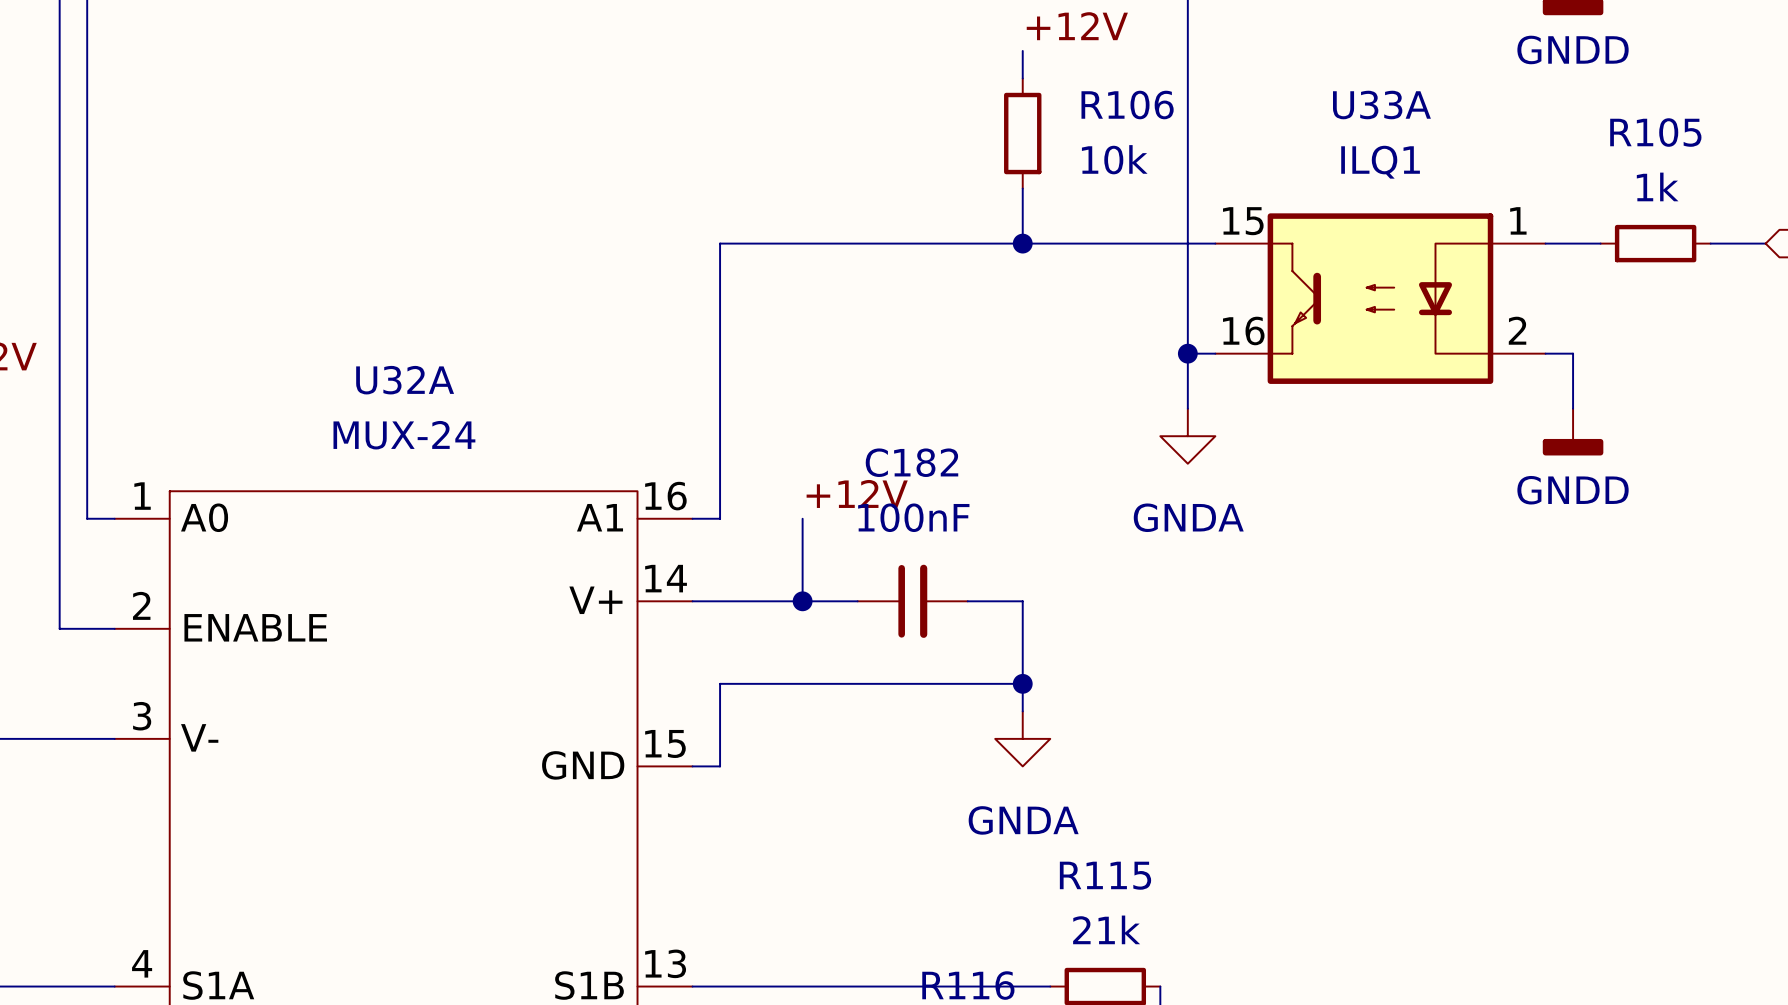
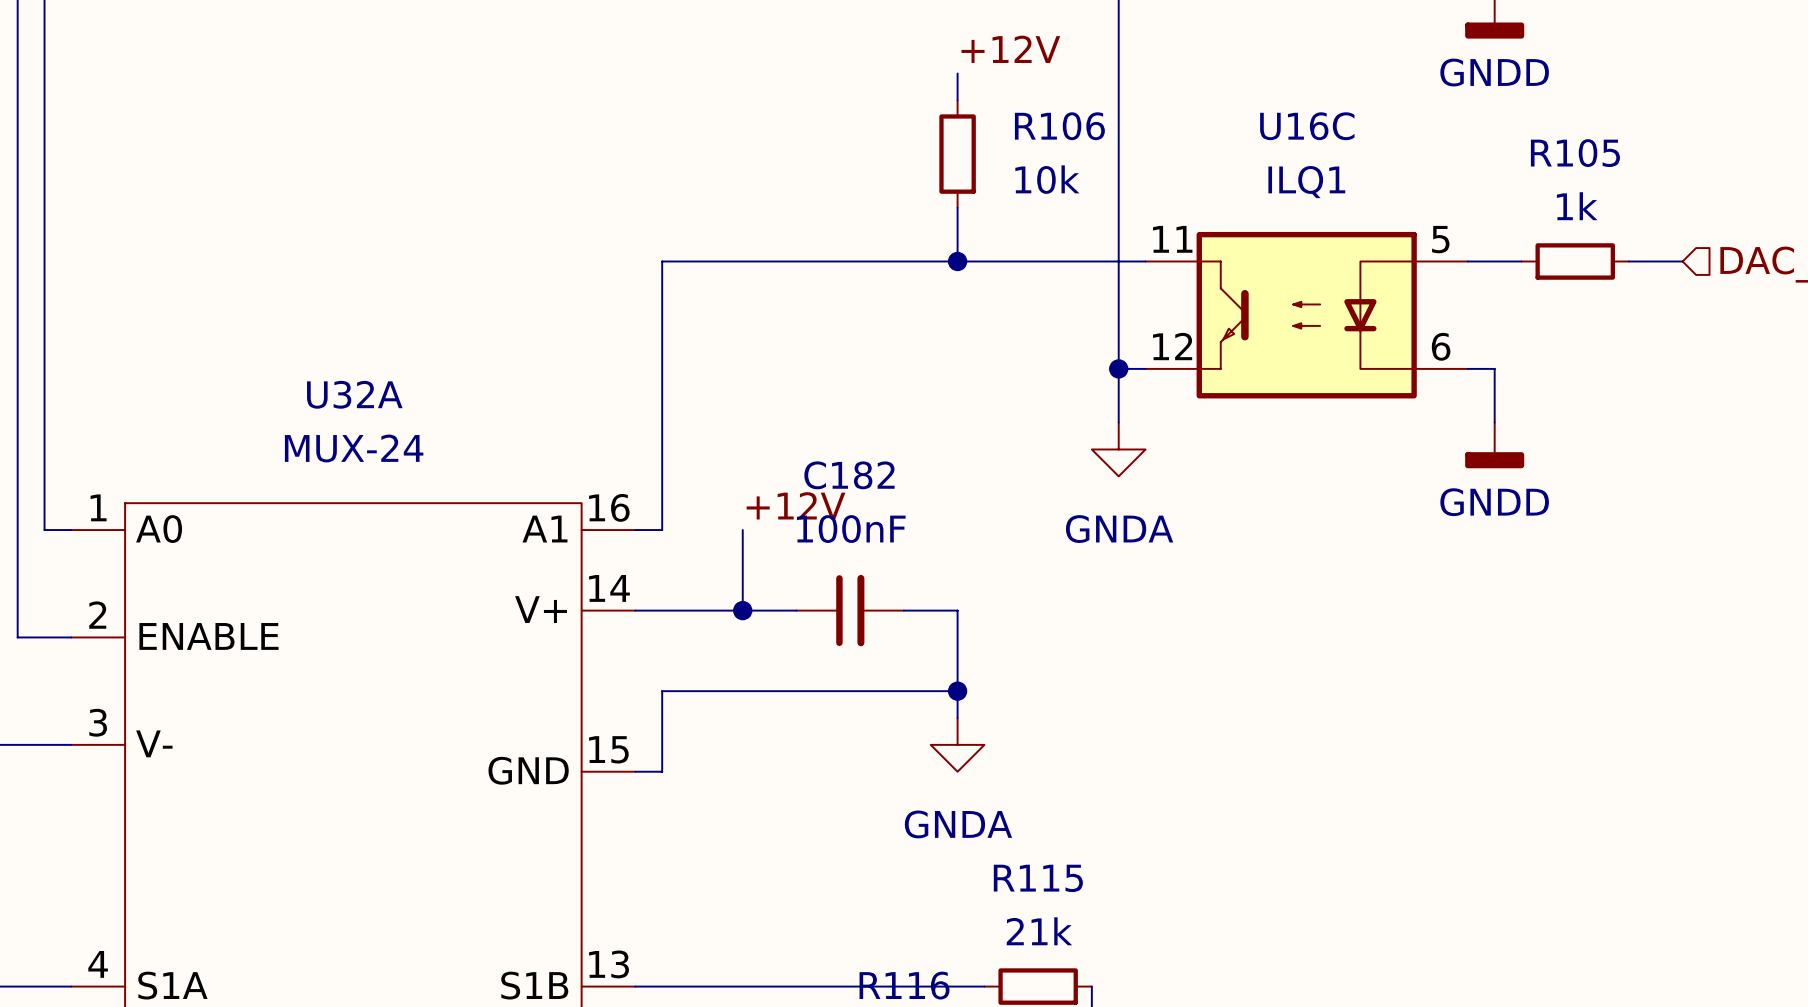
U33A name: U33A (1381, 105) -> U16C (1307, 126)
U33A pin number: 1 (1518, 220) -> 5 (1440, 239)
U33A pin number: 15 (1243, 221) -> 11 (1172, 239)
U33A pin number: 16 (1243, 330) -> 12 (1172, 346)
U33A pin number: 2 (1517, 330) -> 6 (1441, 346)

